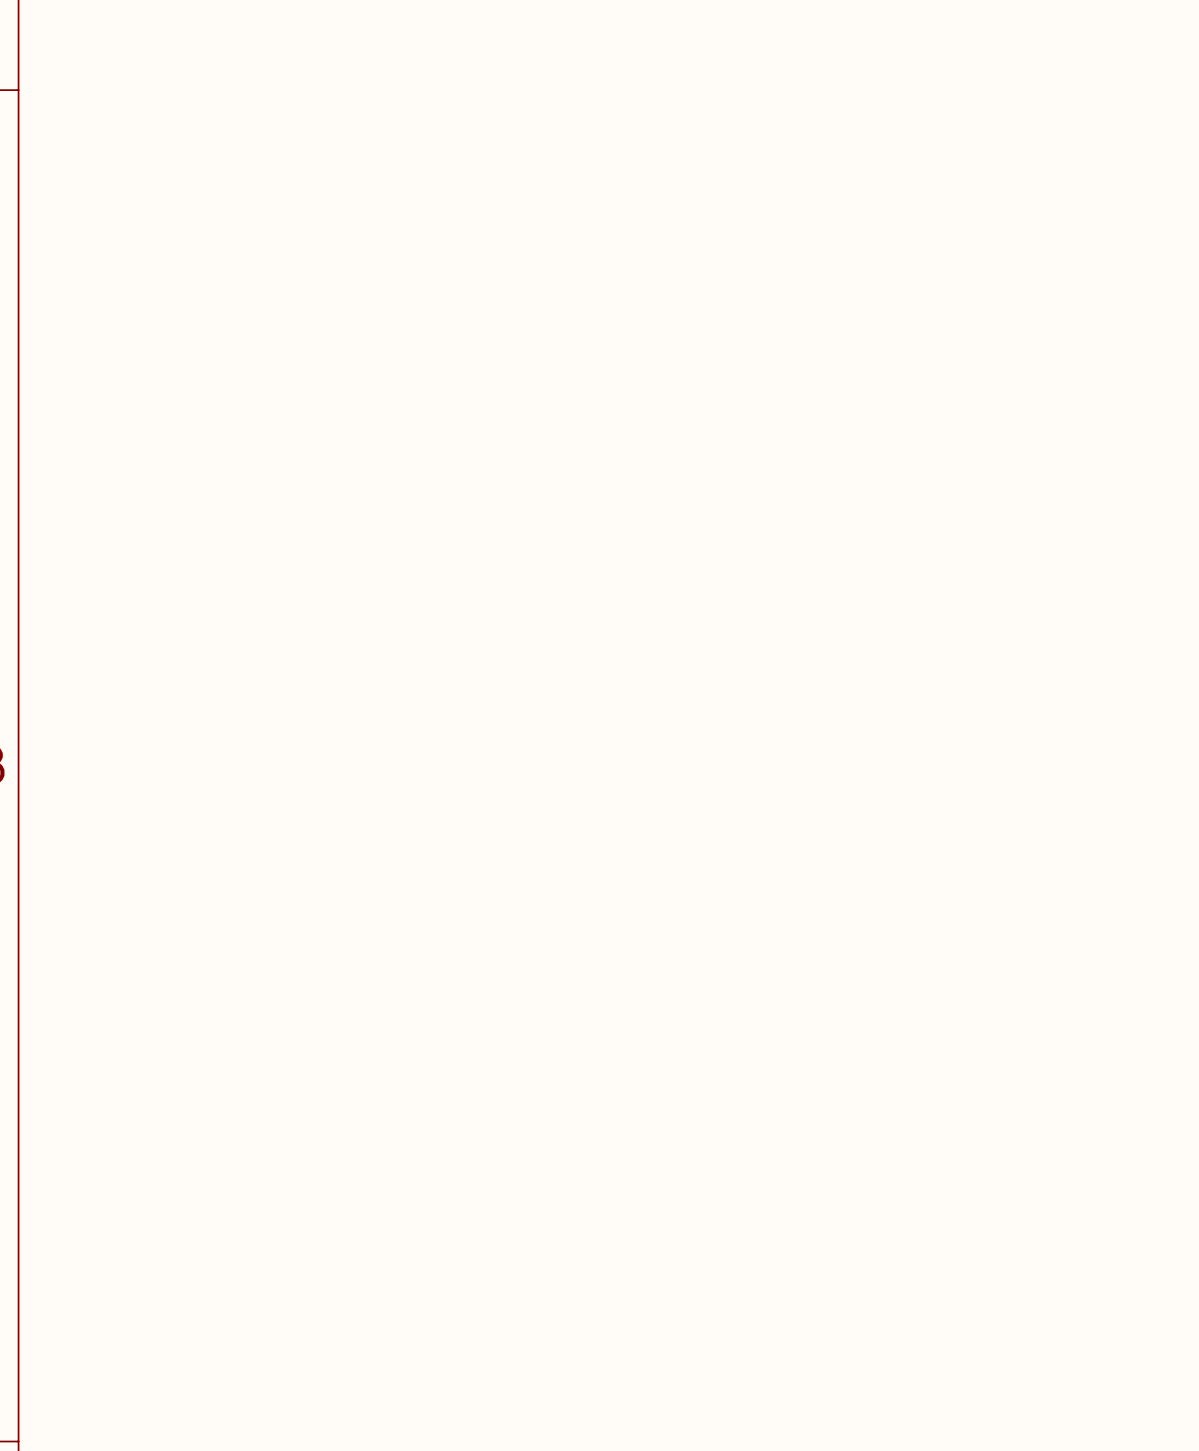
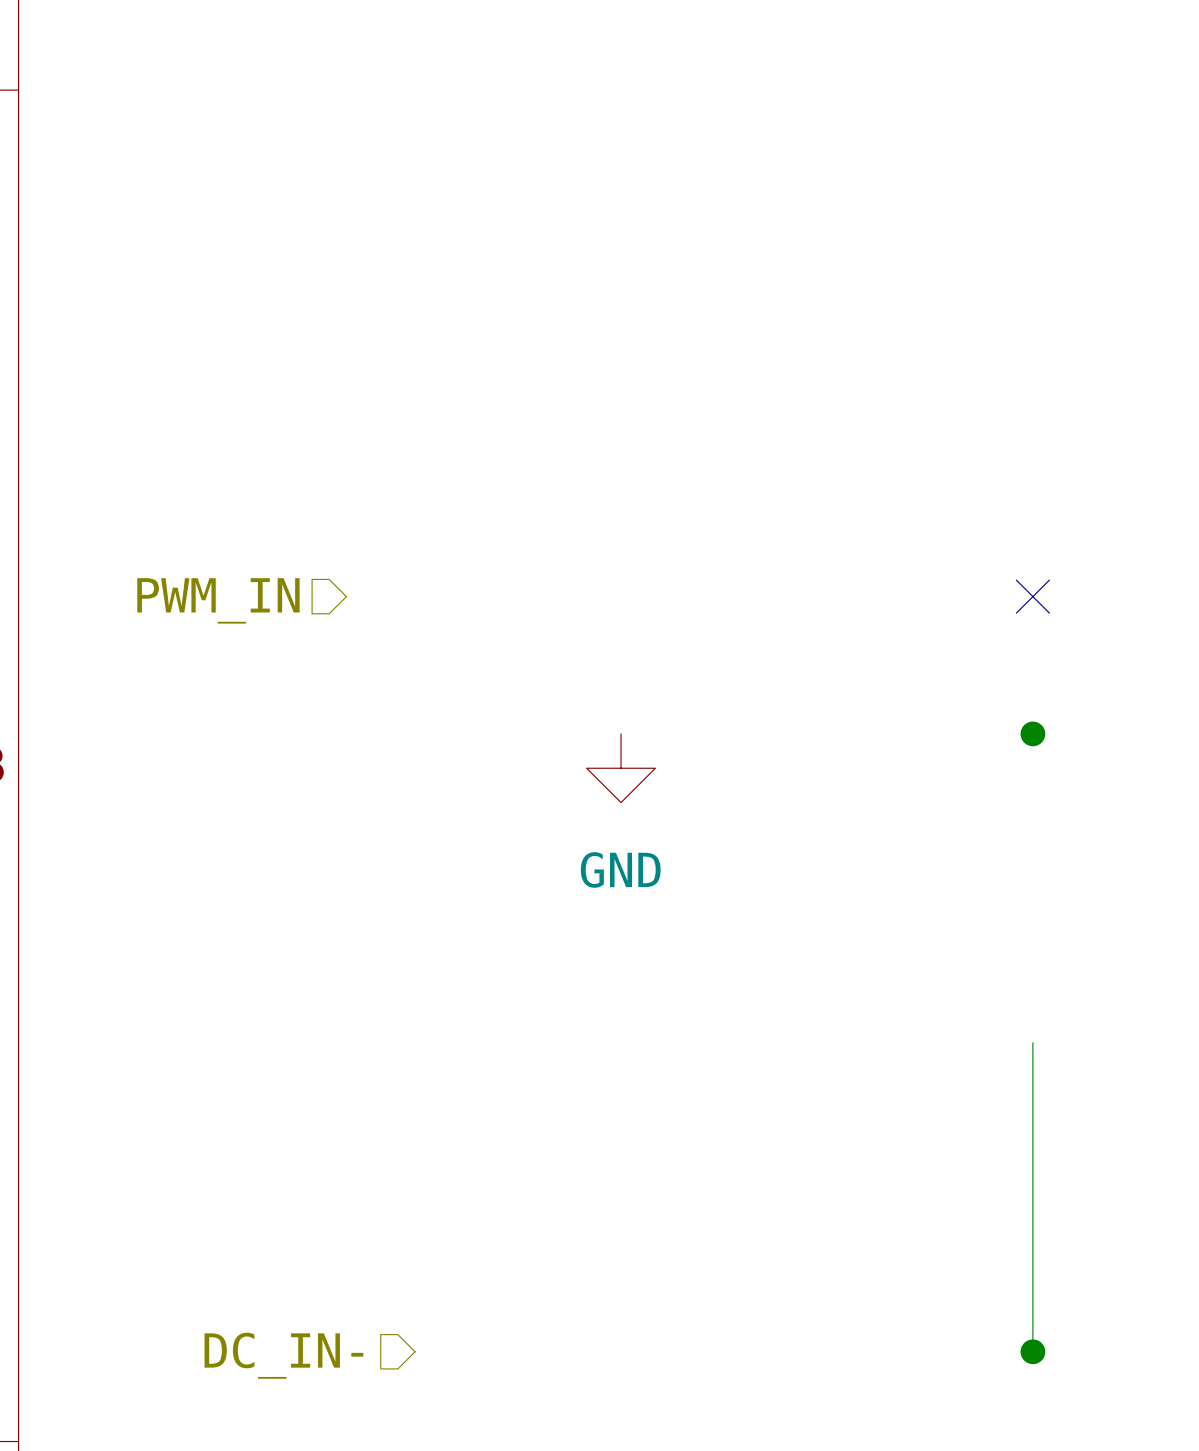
hierarchical label: none -> PWM_IN (218, 600)
no-connect mark: none -> (1032, 596)
junction: none -> (1032, 733)
power symbol: none -> GND (621, 768)
wire: none -> (1032, 1042) (1032, 1351)
junction: none -> (1032, 1351)
hierarchical label: none -> DC_IN- (283, 1355)

